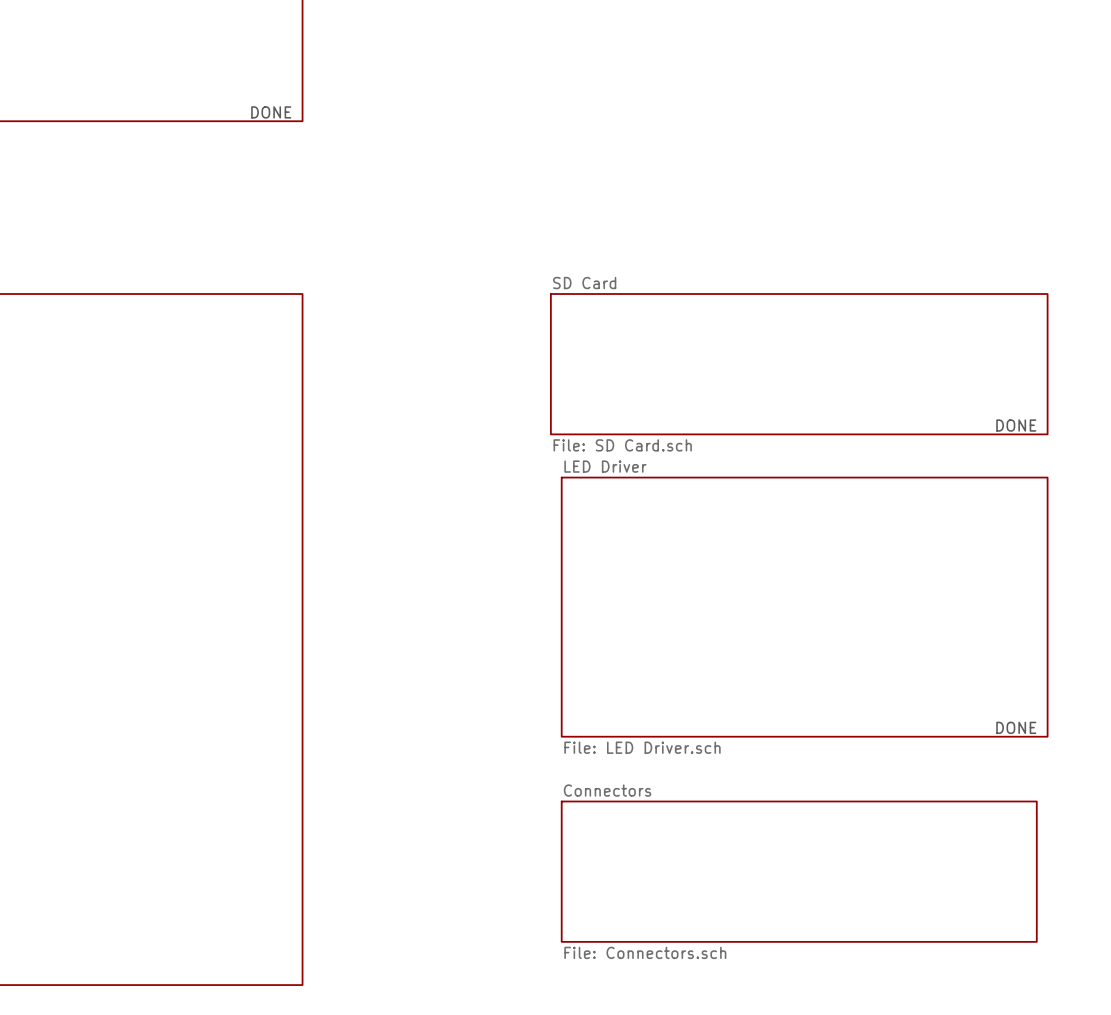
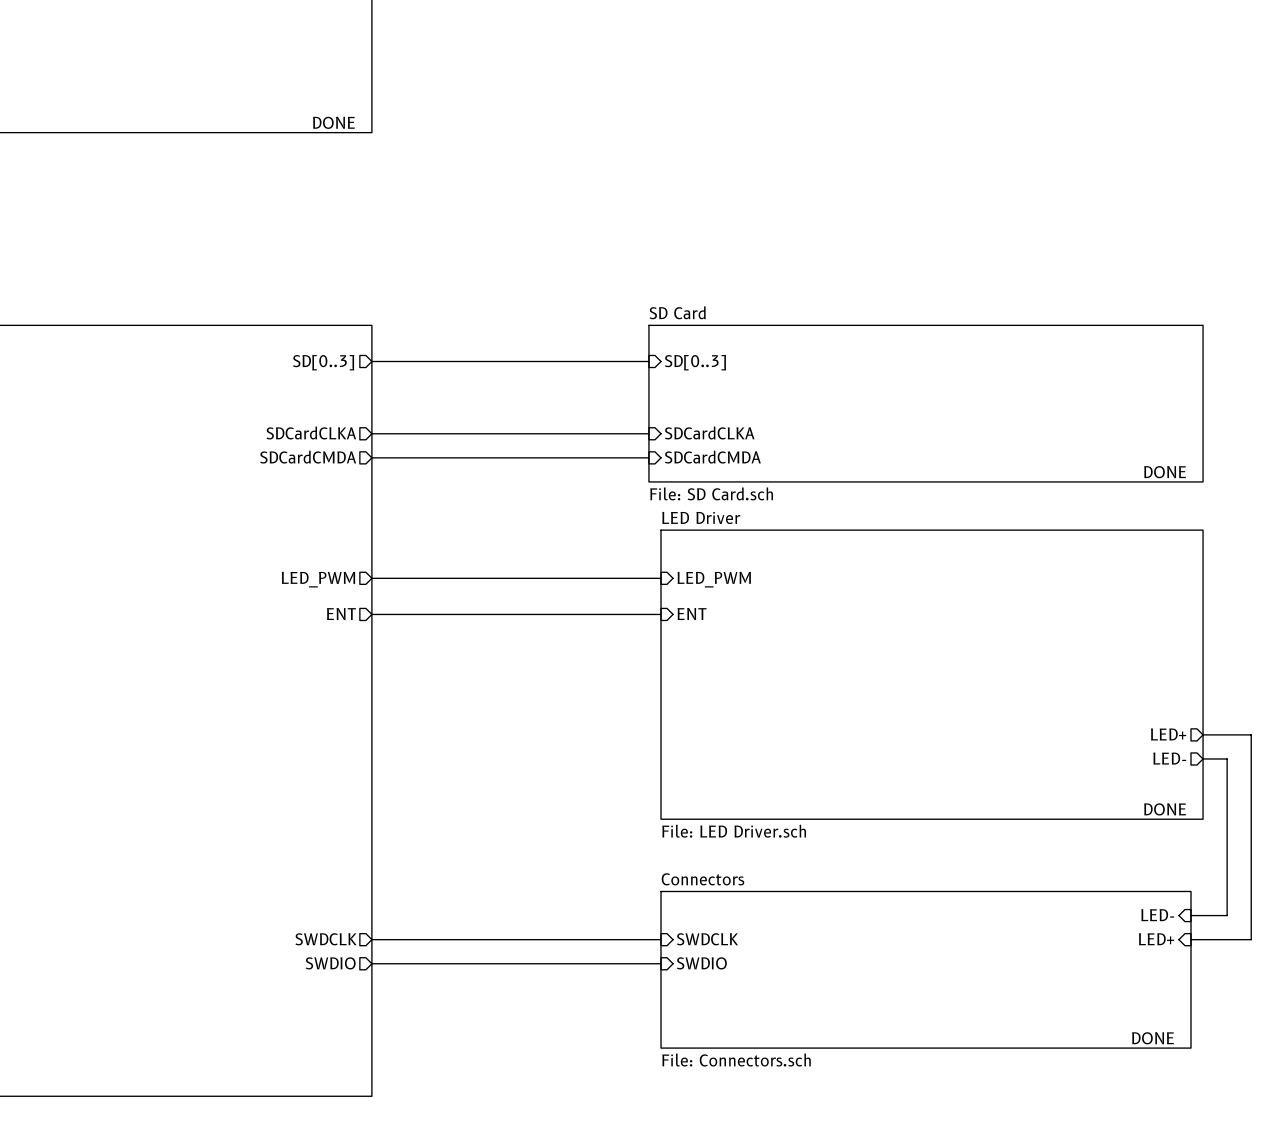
bus: none -> (371, 361) (648, 361)
sheet pin: none -> SD[0..3] (323, 362)
sheet pin: none -> SD[0..3] (695, 362)
sheet pin: none -> SDCardCLKA (311, 432)
sheet pin: none -> SDCardCLKA (709, 432)
wire: none -> (371, 433) (648, 433)
sheet pin: none -> SDCardCMDA (308, 457)
wire: none -> (371, 457) (648, 457)
sheet pin: none -> SDCardCMDA (712, 457)
sheet pin: none -> LED_PWM (318, 579)
wire: none -> (371, 578) (661, 578)
sheet pin: none -> LED_PWM (714, 579)
sheet pin: none -> ENT (341, 614)
sheet pin: none -> ENT (692, 614)
wire: none -> (371, 614) (661, 614)
sheet pin: none -> LED+ (1168, 734)
wire: none -> (1203, 734) (1251, 734) (1251, 939) (1191, 939)
sheet pin: none -> LED- (1169, 758)
wire: none -> (1203, 758) (1227, 758) (1227, 915) (1191, 915)
sheet pin: none -> LED- (1157, 915)
sheet pin: none -> SWDCLK (326, 939)
wire: none -> (371, 939) (661, 939)
sheet pin: none -> SWDCLK (707, 939)
sheet pin: none -> LED+ (1156, 939)
sheet pin: none -> SWDIO (330, 963)
sheet pin: none -> SWDIO (701, 963)
wire: none -> (371, 963) (661, 963)
text: none -> DONE (1153, 1038)

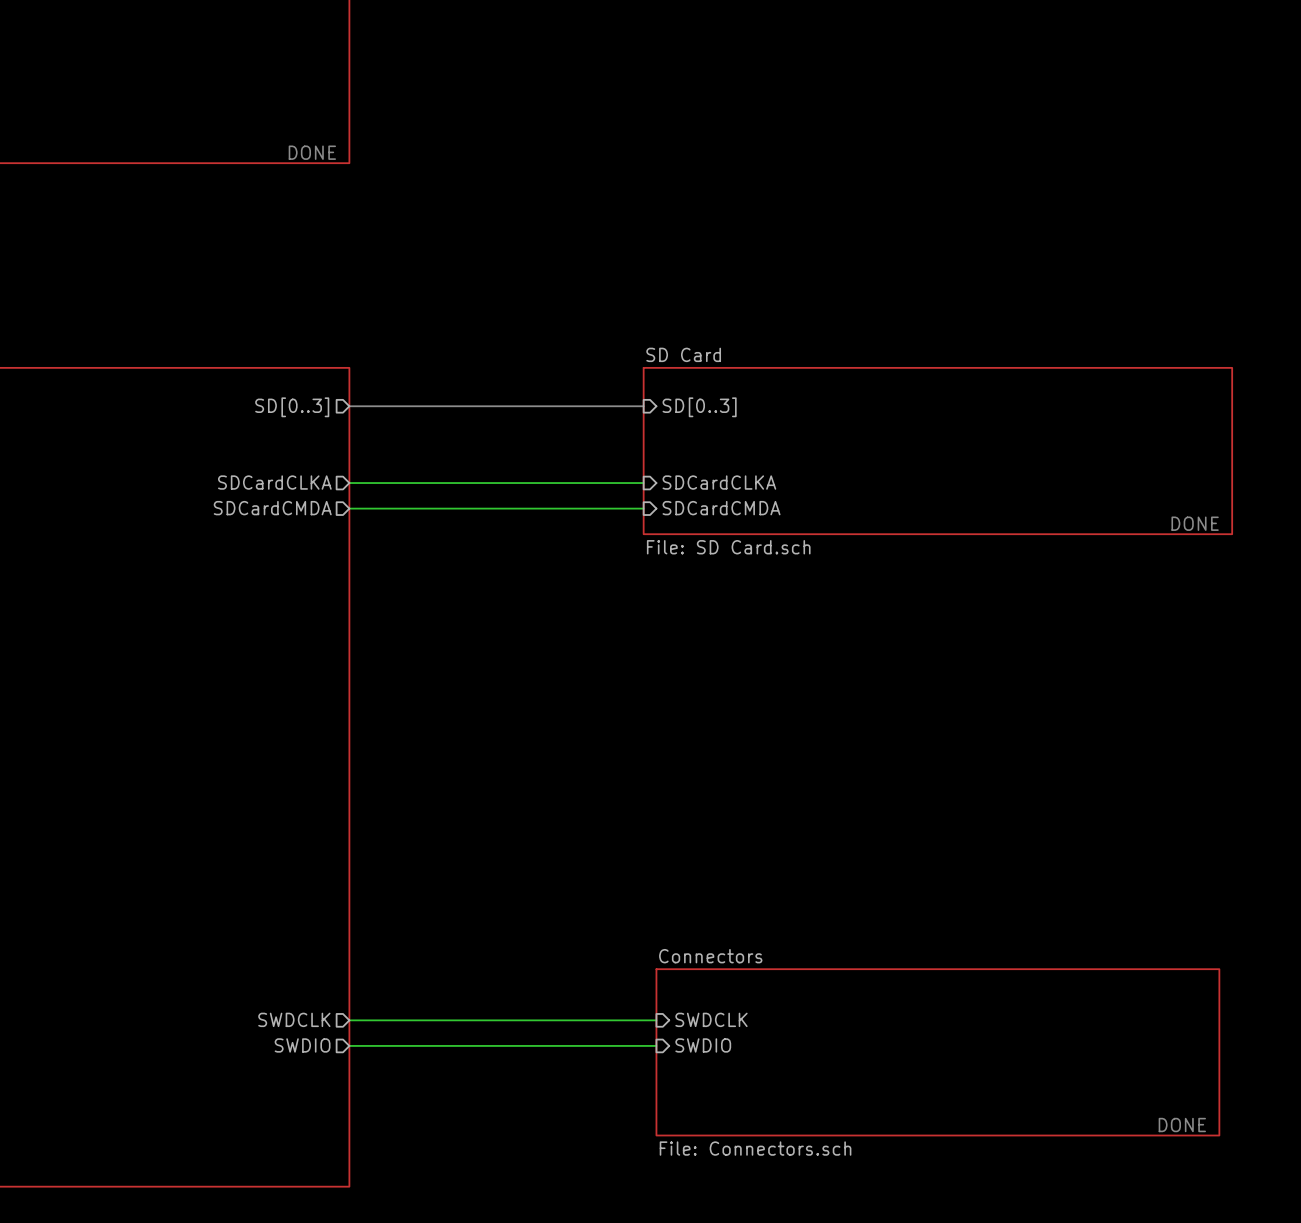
wire: (371, 578) (661, 578) -> none
sheet pin: LED_PWM (318, 579) -> none
sheet pin: LED_PWM (714, 579) -> none
sheet pin: ENT (341, 614) -> none
wire: (371, 614) (661, 614) -> none
sheet pin: ENT (692, 614) -> none
sheet LED Driver: File: LED Driver.sch (932, 674) -> none
sheet pin: LED+ (1168, 734) -> none
wire: (1203, 734) (1251, 734) (1251, 939) (1191, 939) -> none
sheet pin: LED- (1169, 758) -> none
wire: (1203, 758) (1227, 758) (1227, 915) (1191, 915) -> none
text: DONE (1165, 809) -> none
sheet pin: LED- (1157, 915) -> none
sheet pin: LED+ (1156, 939) -> none

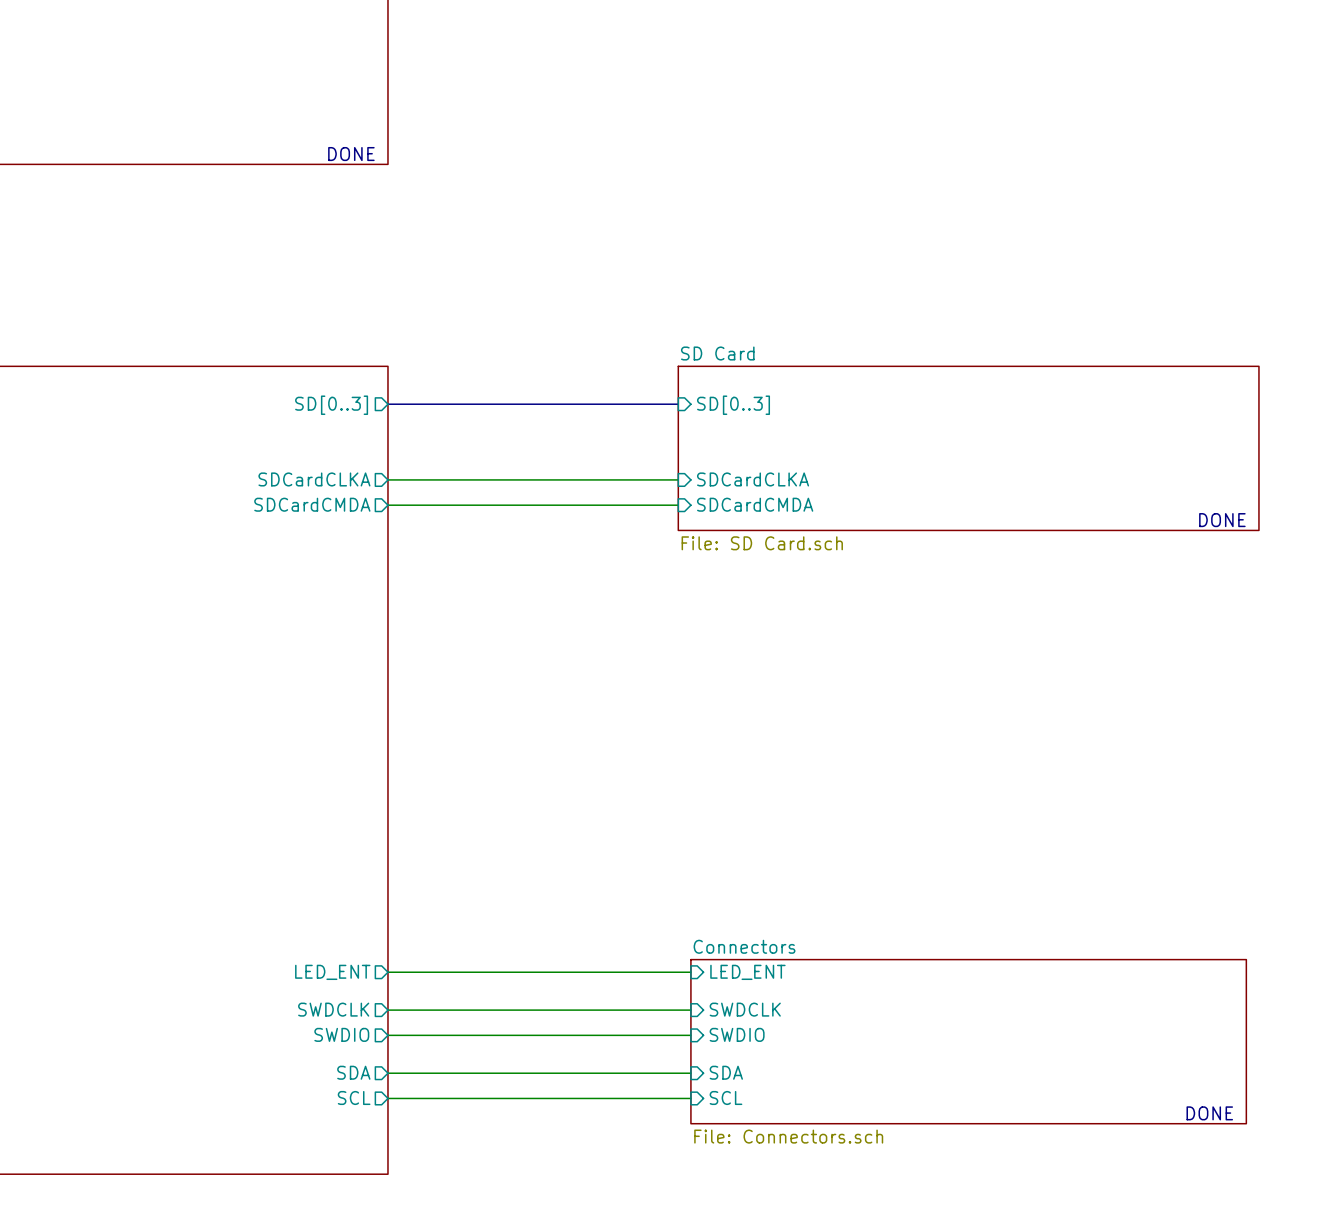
wire: none -> (387, 972) (690, 972)
sheet pin: none -> LED_ENT (332, 972)
sheet pin: none -> LED_ENT (747, 972)
sheet pin: none -> SDA (353, 1072)
sheet pin: none -> SDA (726, 1072)
wire: none -> (387, 1073) (690, 1073)
sheet pin: none -> SCL (354, 1097)
wire: none -> (387, 1098) (690, 1098)
sheet pin: none -> SCL (725, 1097)

